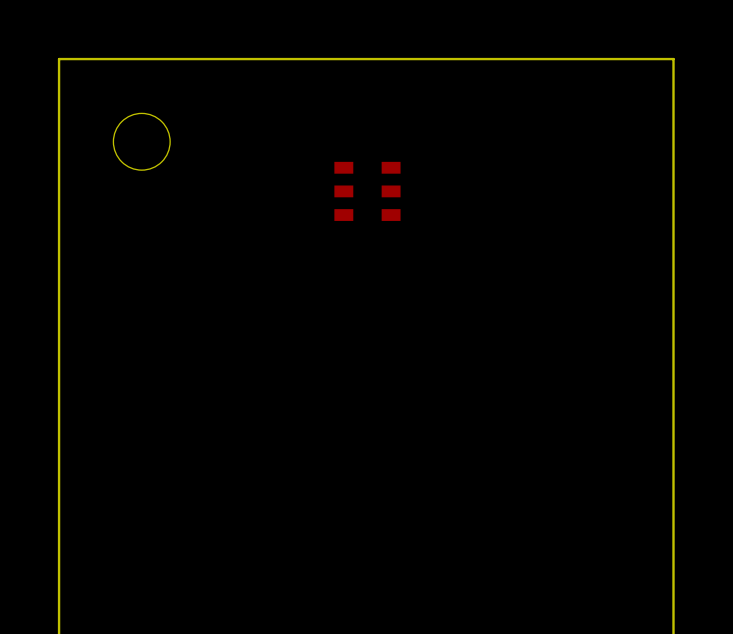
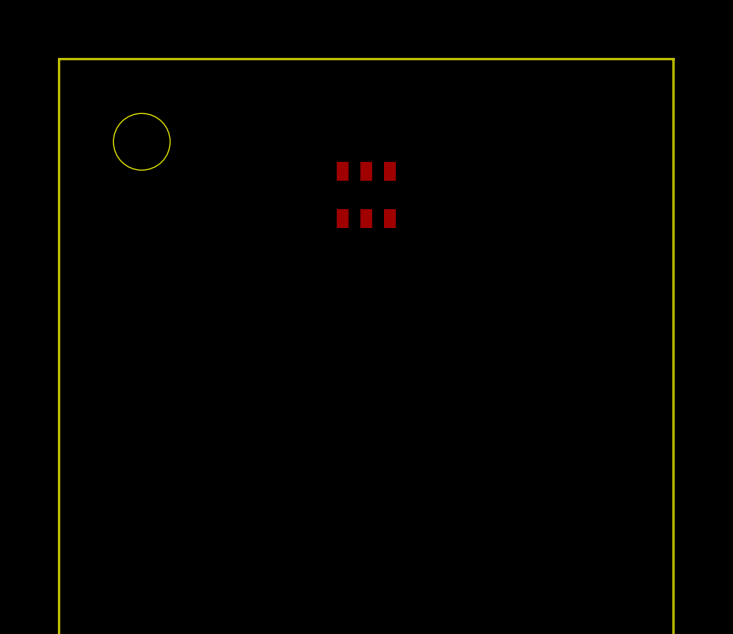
part rotation: 0° (367, 191) -> 90° clockwise (366, 194)

